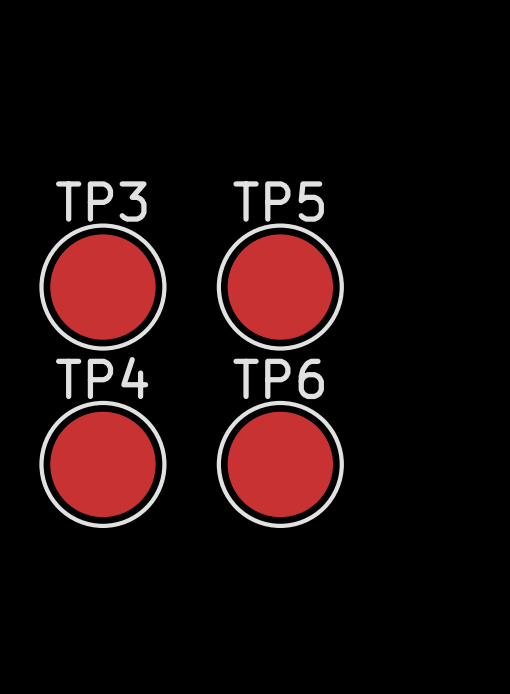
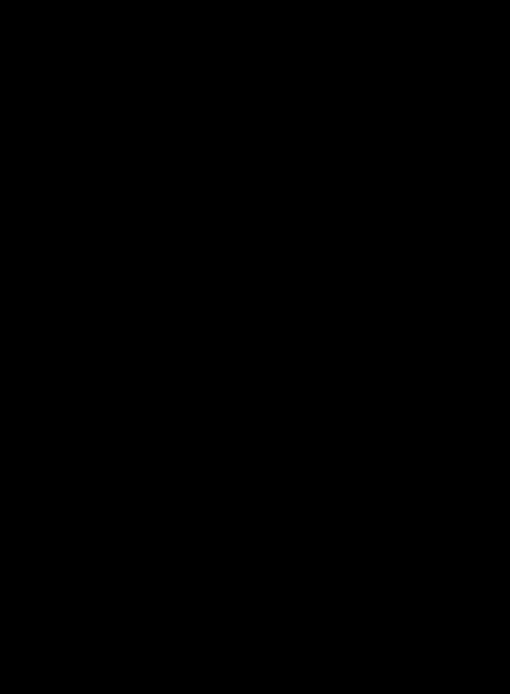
TP3: (102, 287) -> none
TP5: (280, 287) -> none
TP4: (102, 464) -> none
TP6: (280, 464) -> none

